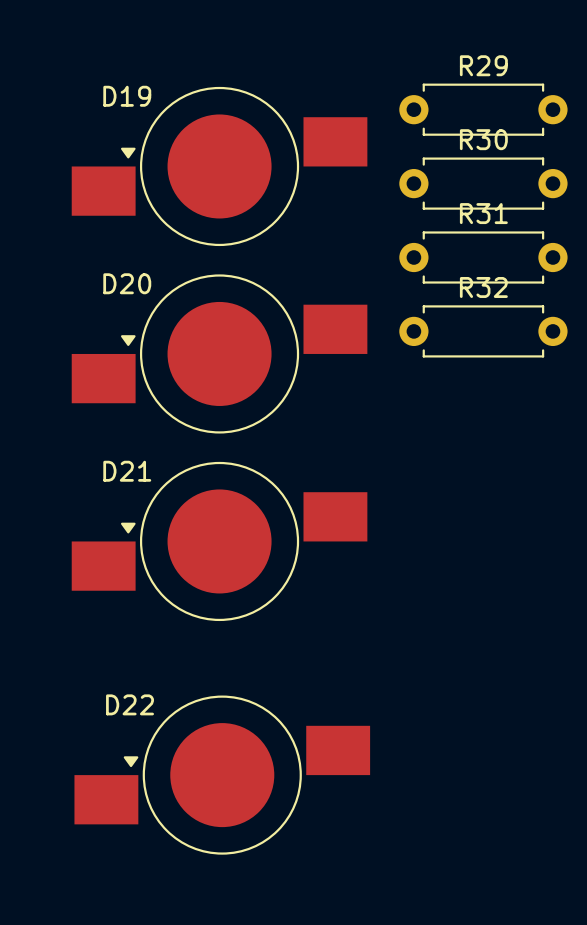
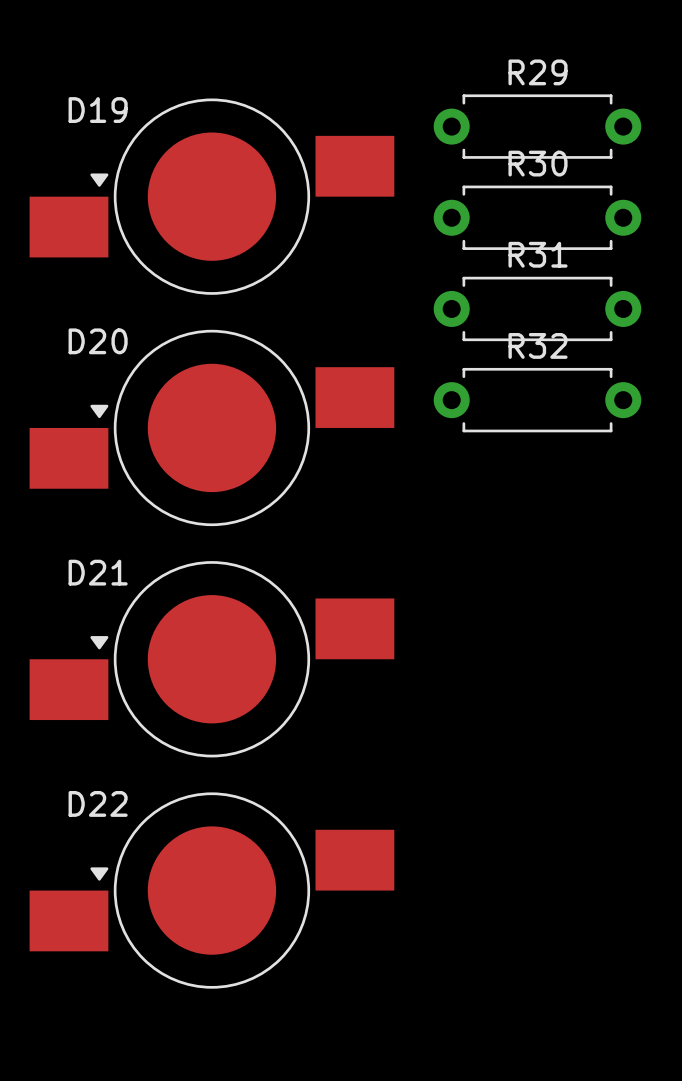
D22 position: (222, 775) -> (211, 890)

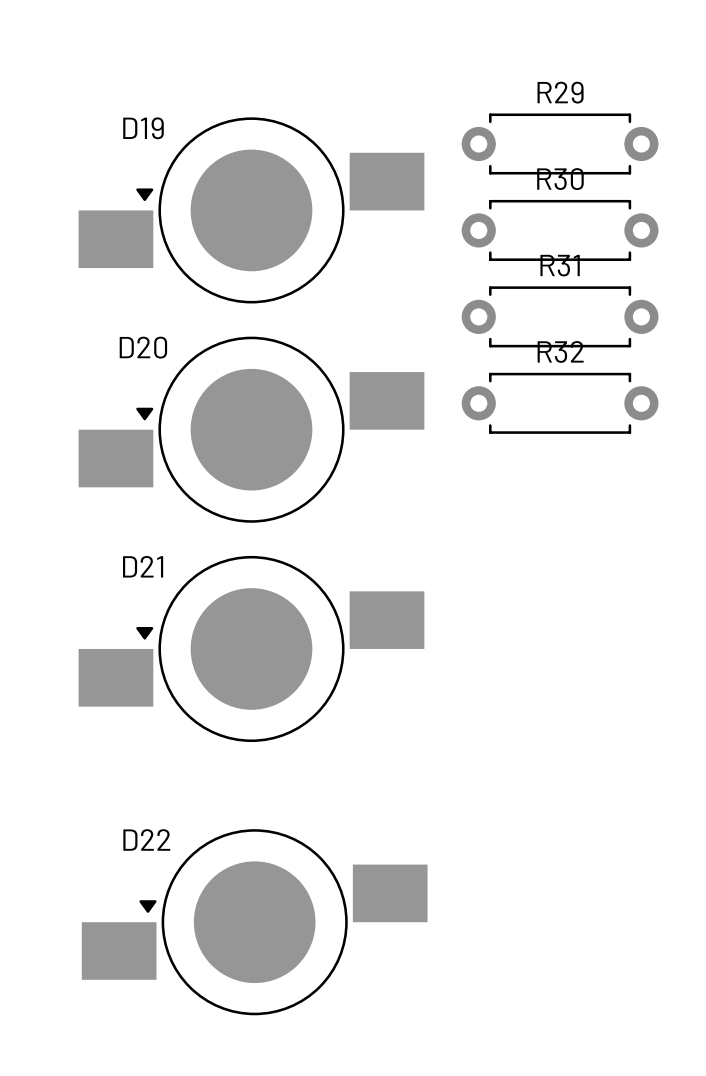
D22 position: (211, 890) -> (254, 922)

